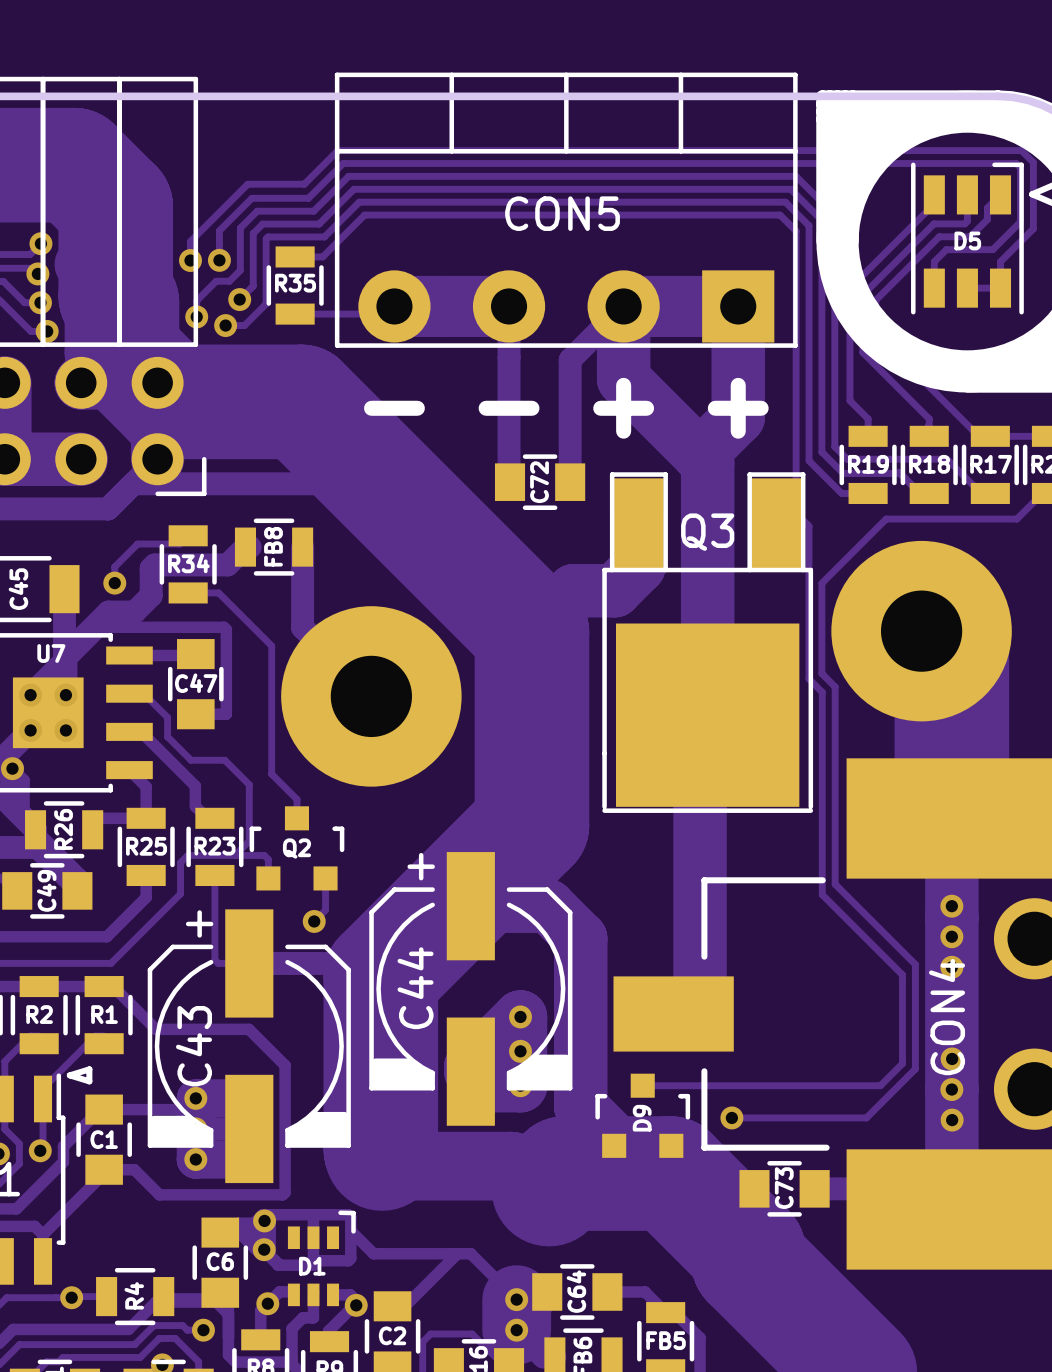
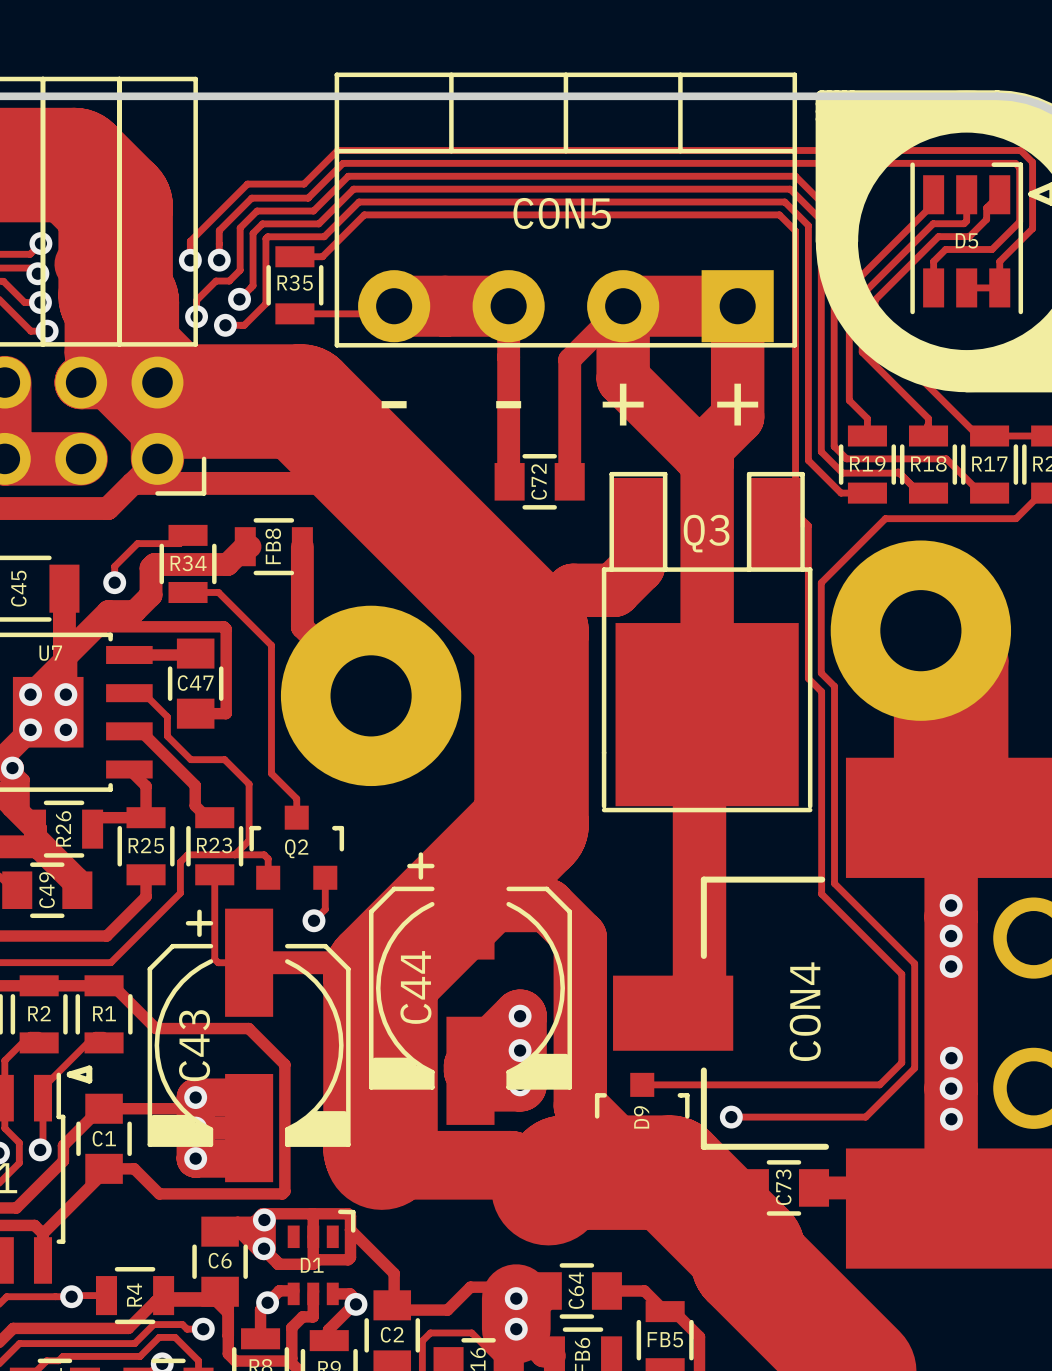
CON4 name position: CON4 (947, 1017) -> CON4 (805, 1011)
track: (373, 1253) (470, 1253) (505, 1288) -> (394, 1310) (447, 1310) (470, 1287) (504, 1287)
track: (455, 1253) (402, 1309) (394, 1309) -> (373, 1252) (394, 1273) (394, 1308)

